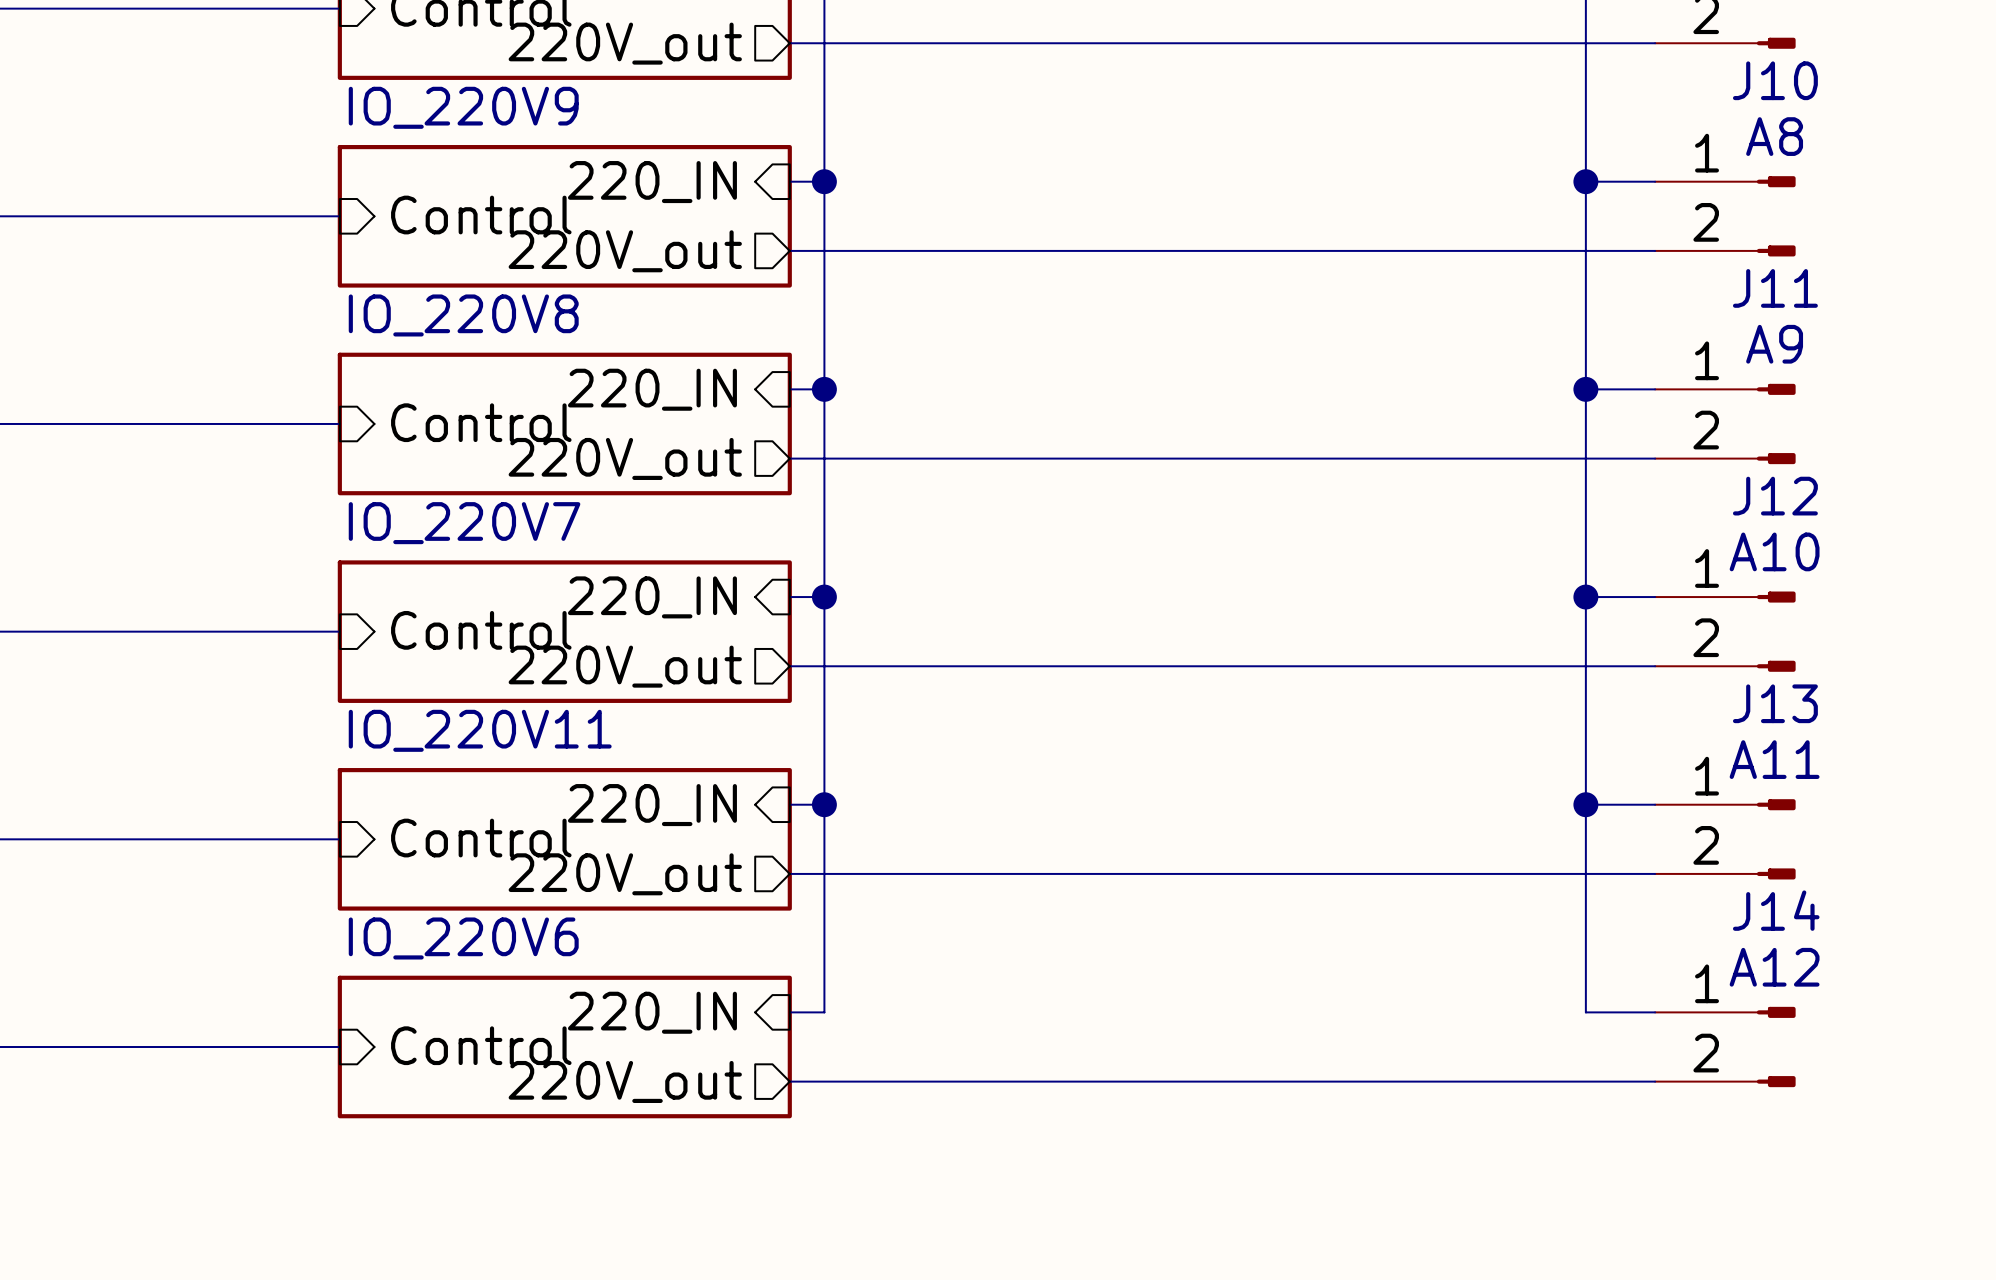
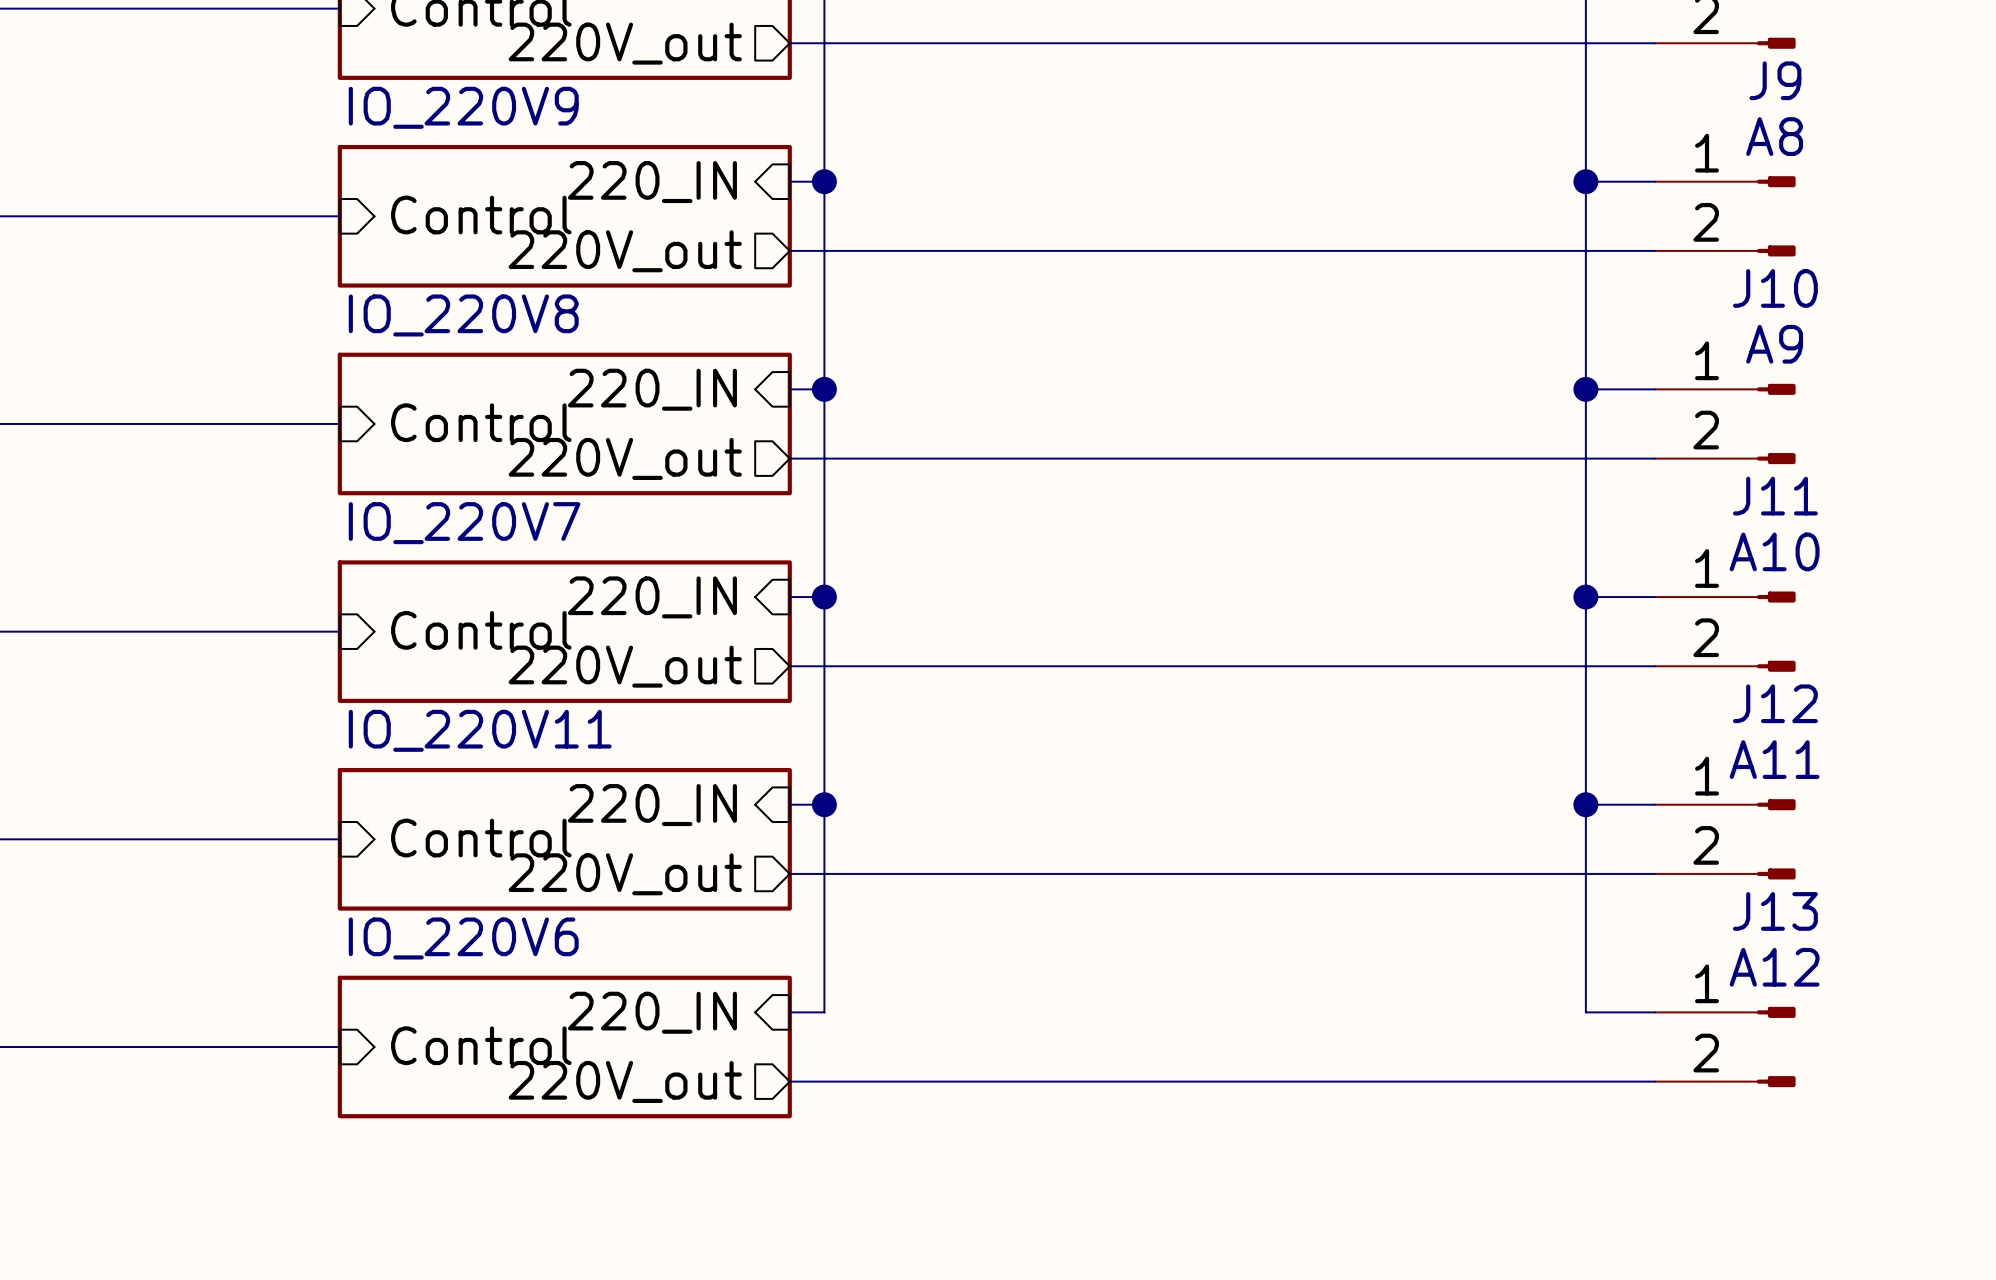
J10 name: J10 (1775, 80) -> J9 (1775, 80)
J11 name: J11 (1775, 288) -> J10 (1775, 288)
J12 name: J12 (1775, 496) -> J11 (1775, 496)
J13 name: J13 (1775, 703) -> J12 (1775, 703)
J14 name: J14 (1776, 910) -> J13 (1775, 911)

